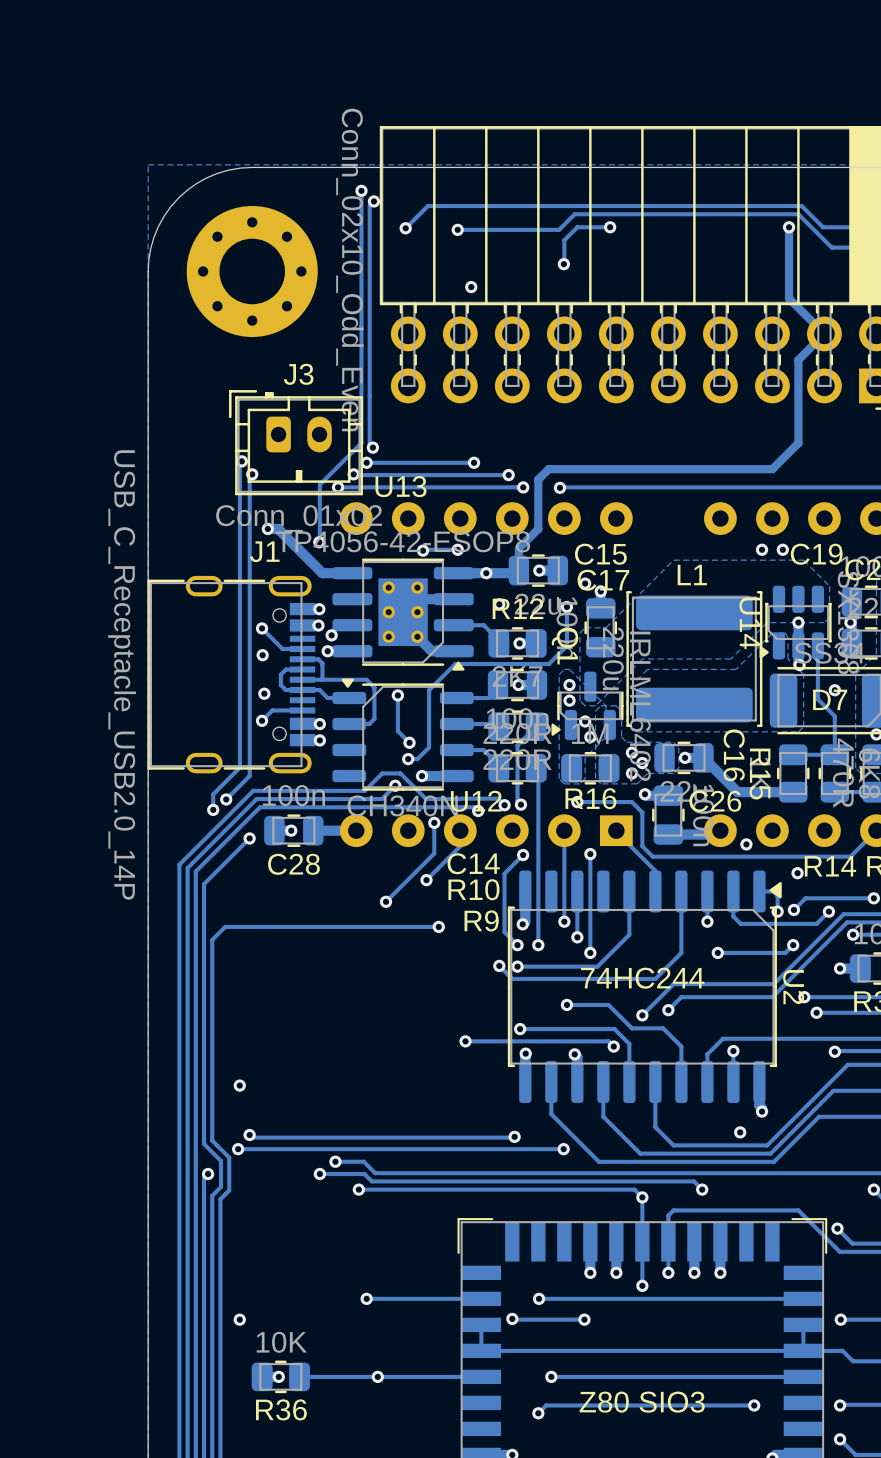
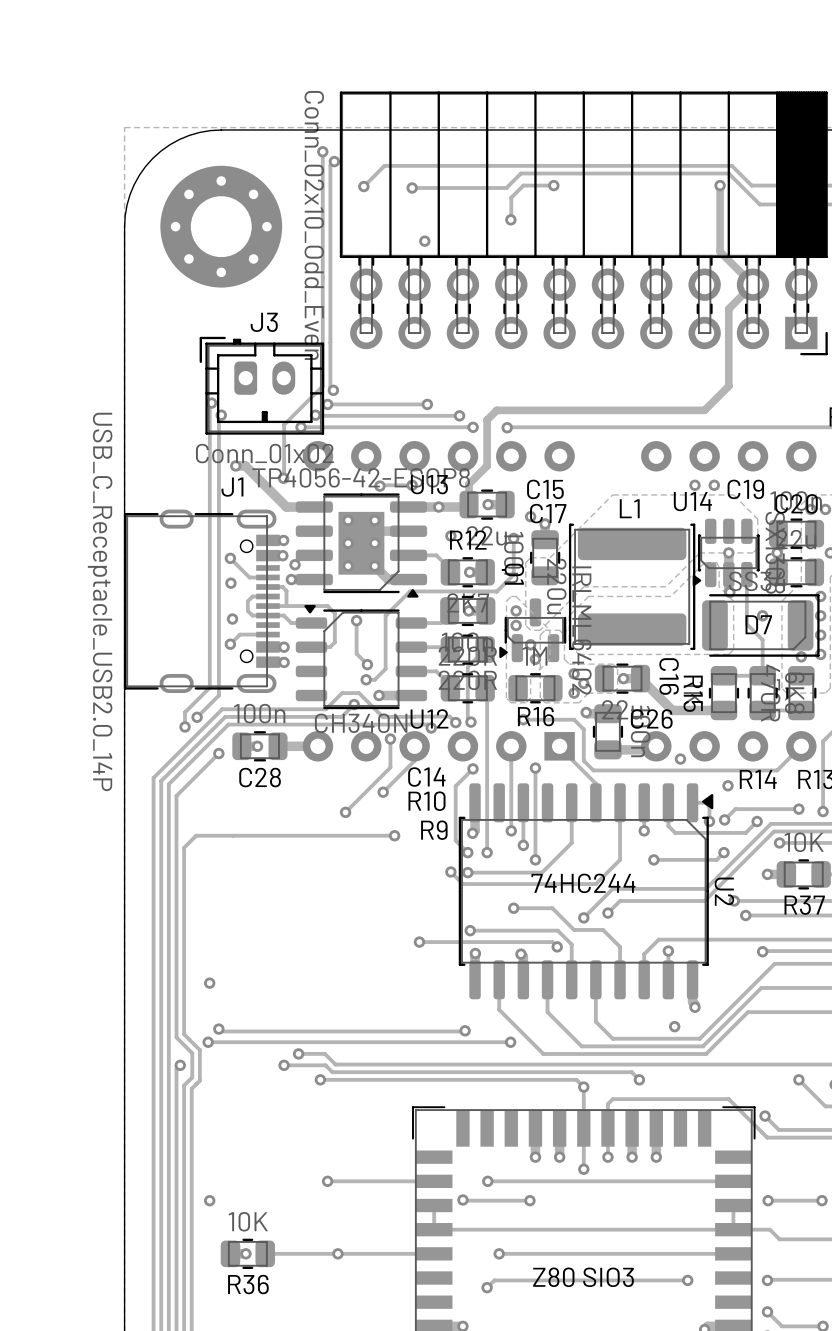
U13 name position: U13 (400, 486) -> U13 (429, 484)
U14 name rotation: 0° (749, 623) -> 90° counterclockwise (692, 501)

